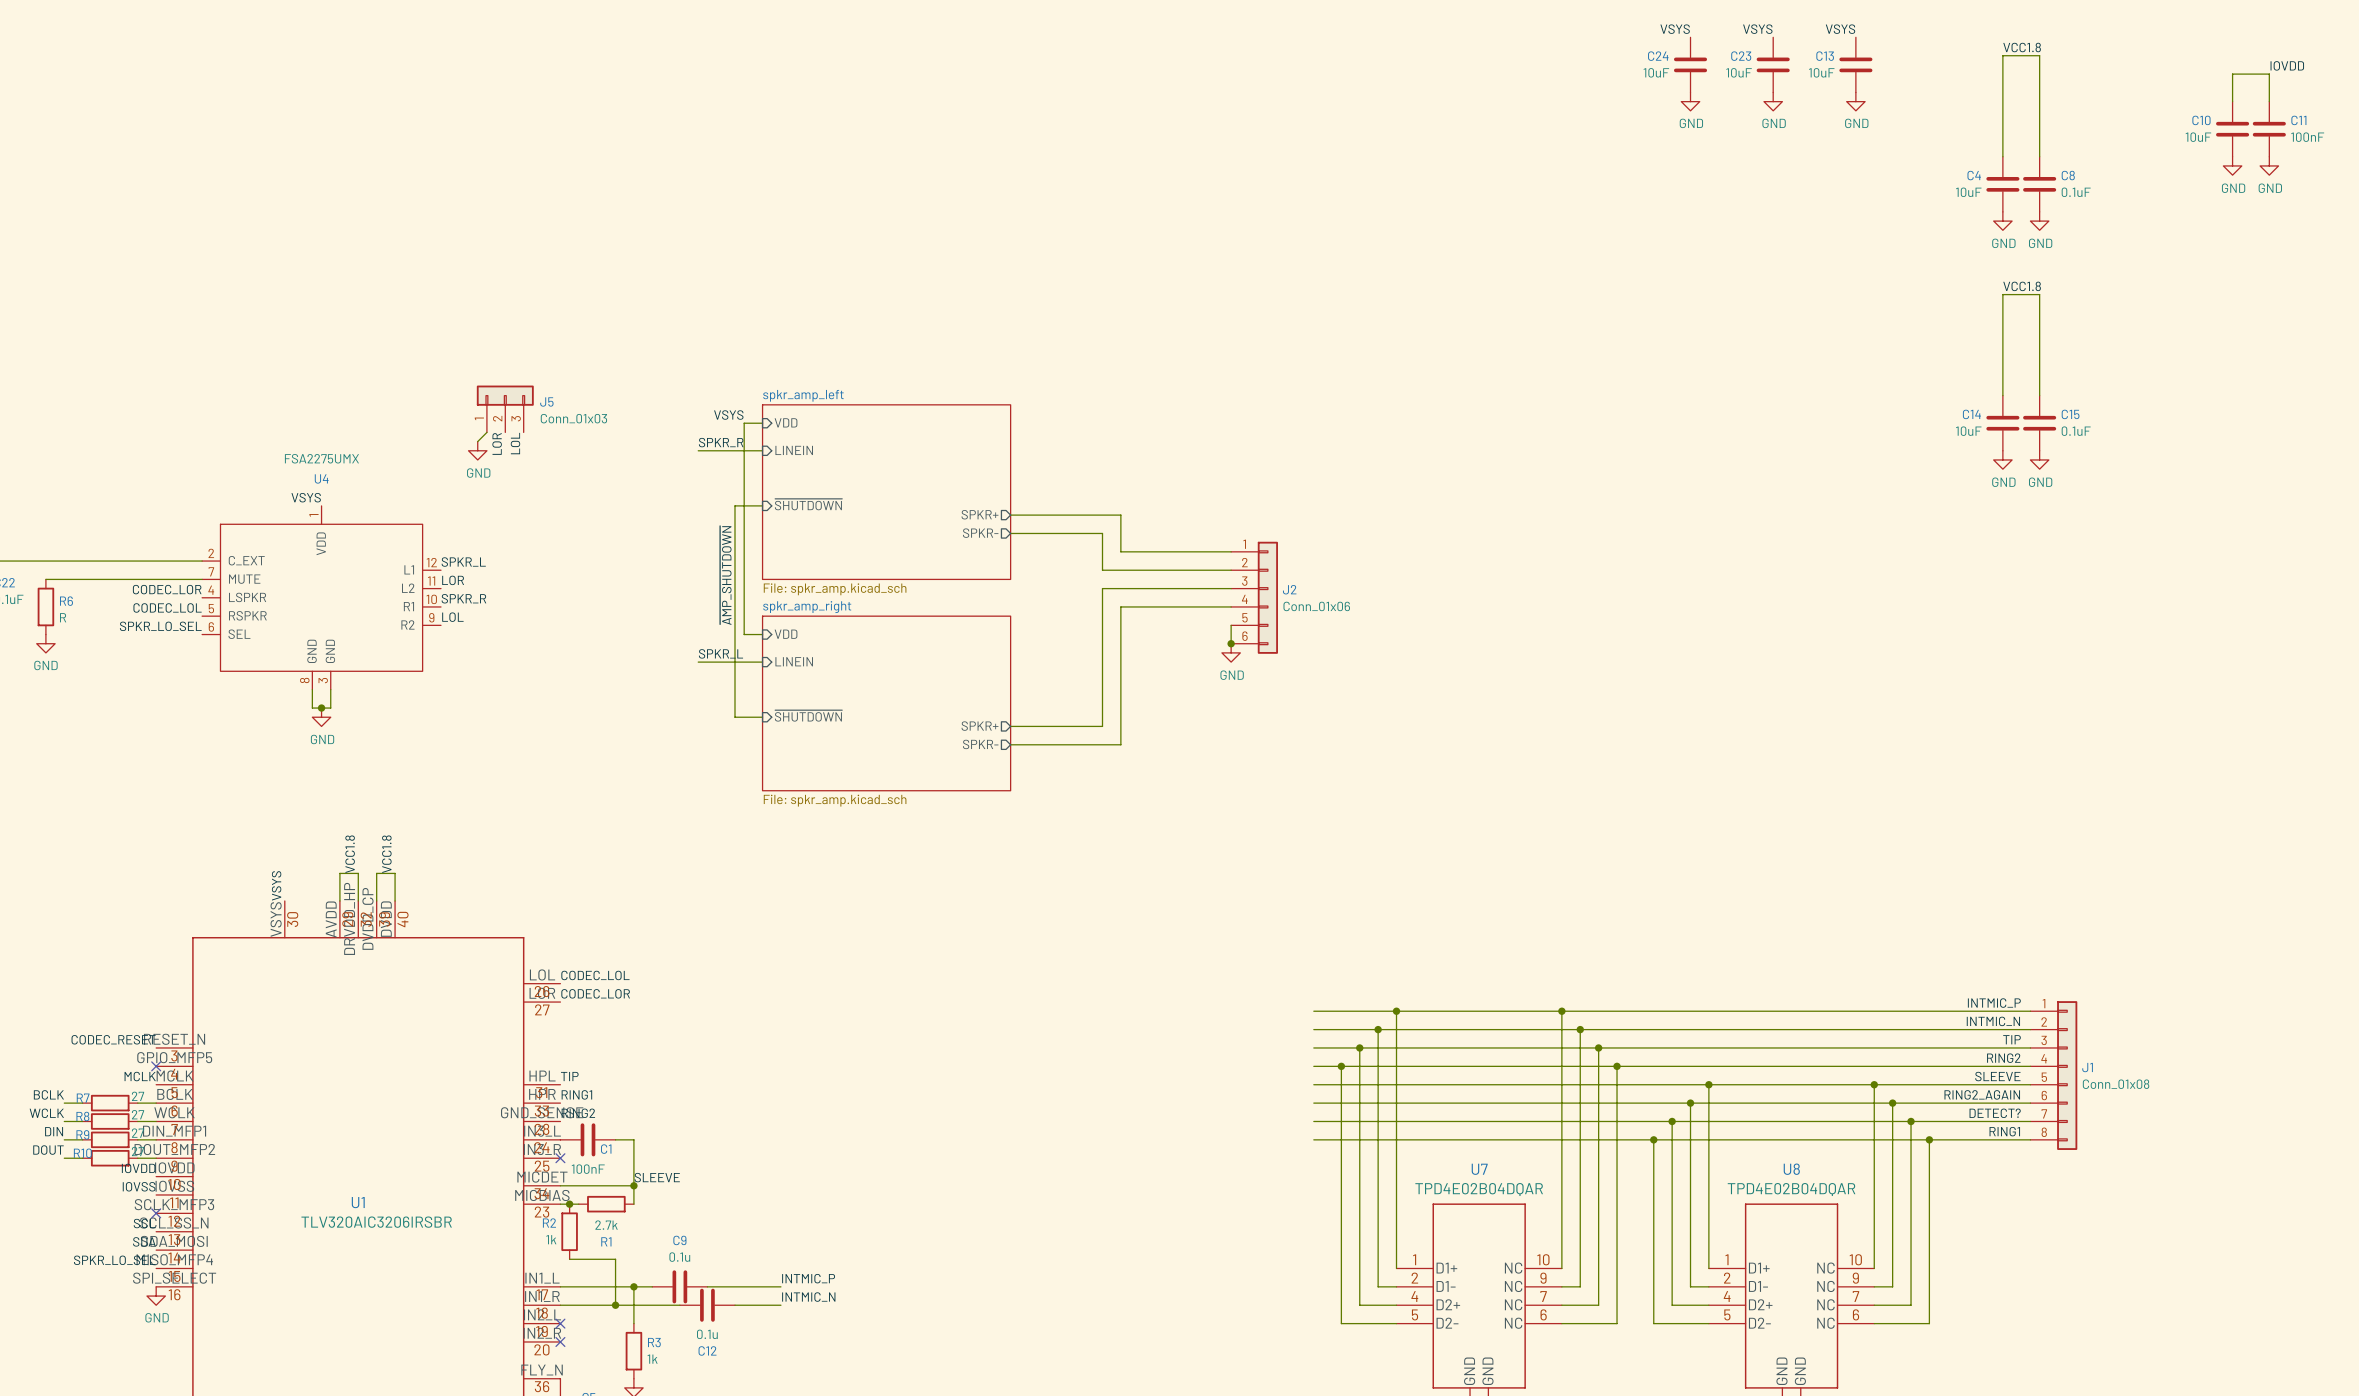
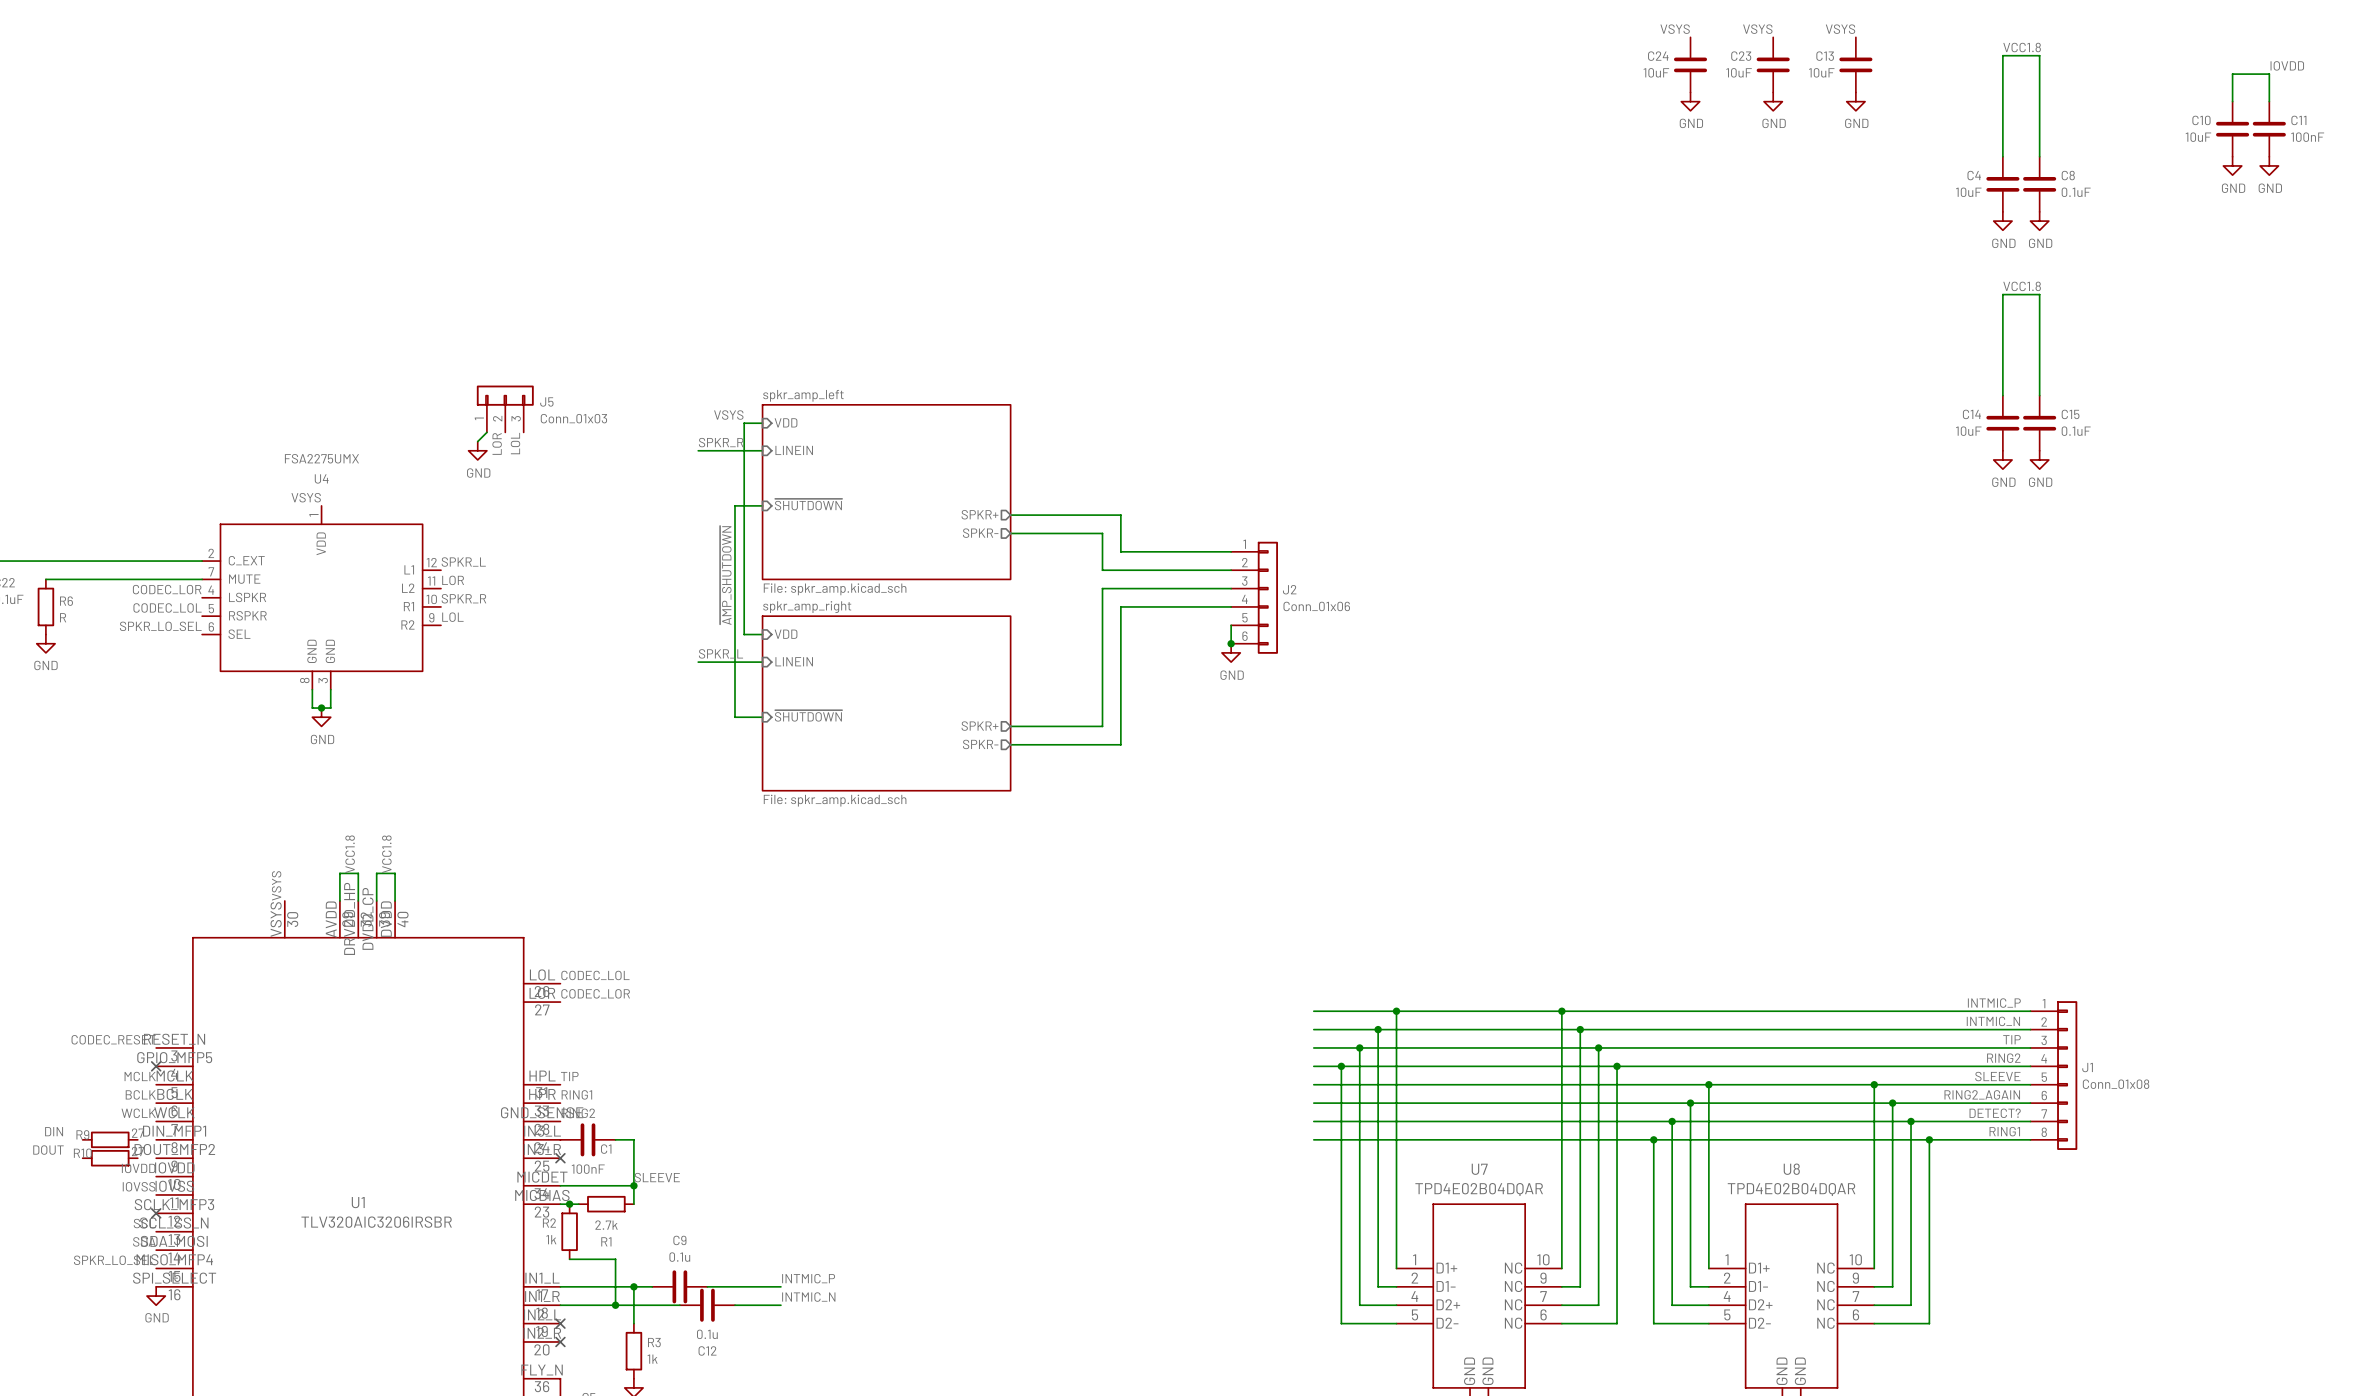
label position: BCLK (48, 1094) -> BCLK (140, 1094)
wire: (64, 1103) (82, 1103) -> none
R7: 27 (110, 1103) -> none
wire: (137, 1103) (156, 1103) -> none
label position: WCLK (46, 1113) -> WCLK (138, 1113)
wire: (64, 1121) (82, 1121) -> none
R8: 27 (110, 1121) -> none
wire: (137, 1121) (156, 1121) -> none
wire: (64, 1139) (82, 1139) -> none
wire: (137, 1139) (156, 1139) -> none
wire: (64, 1158) (82, 1158) -> none
wire: (137, 1158) (156, 1158) -> none

